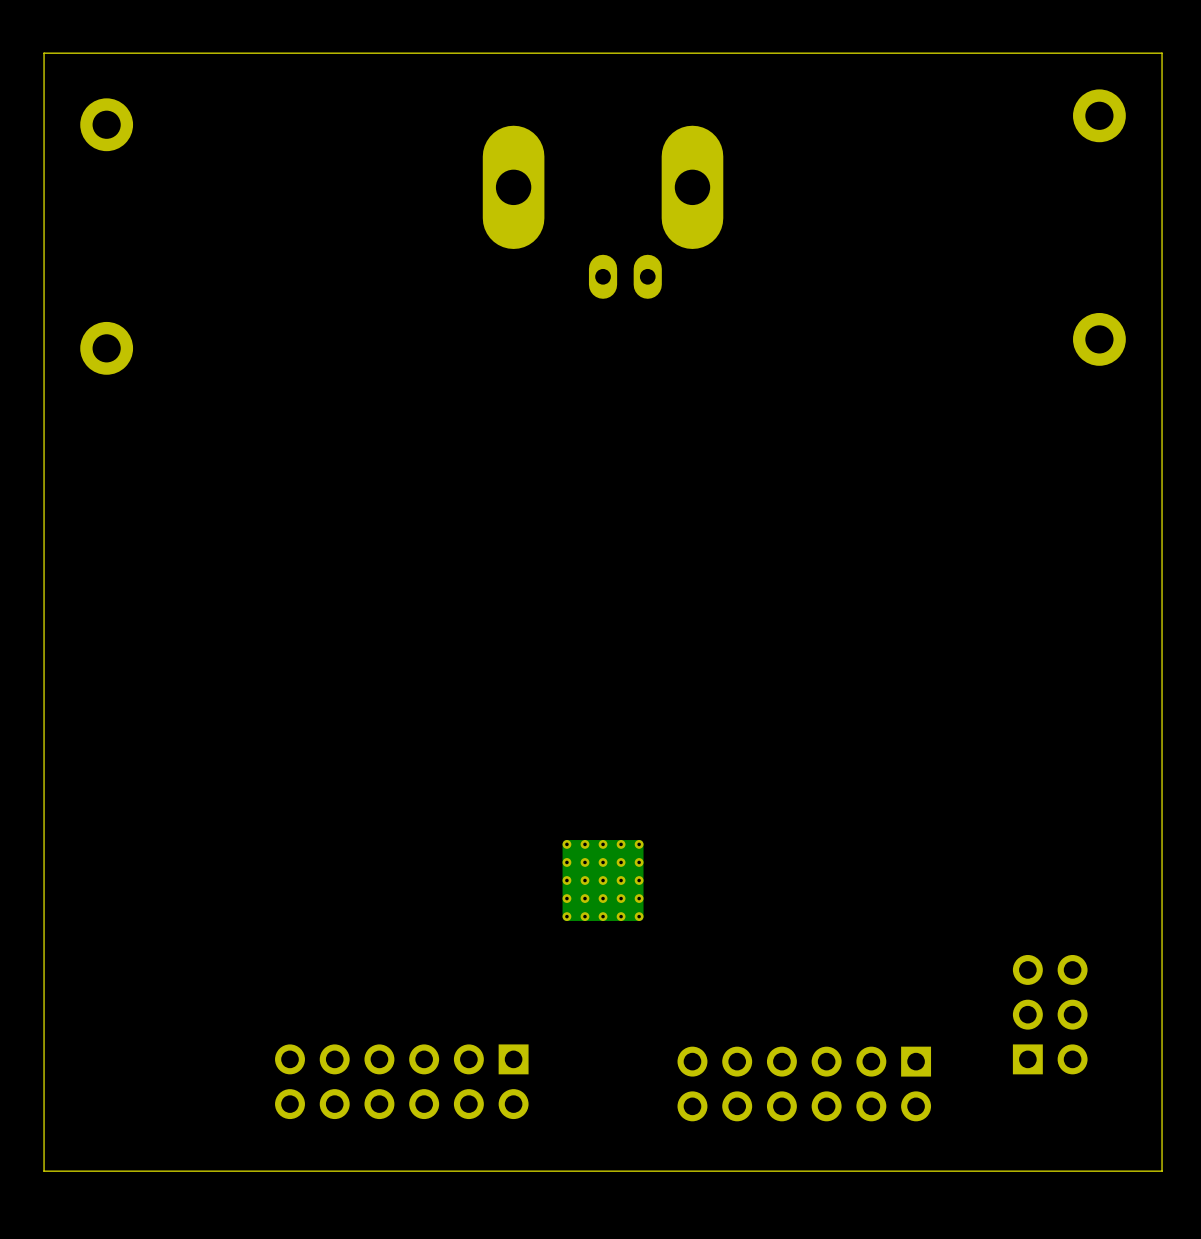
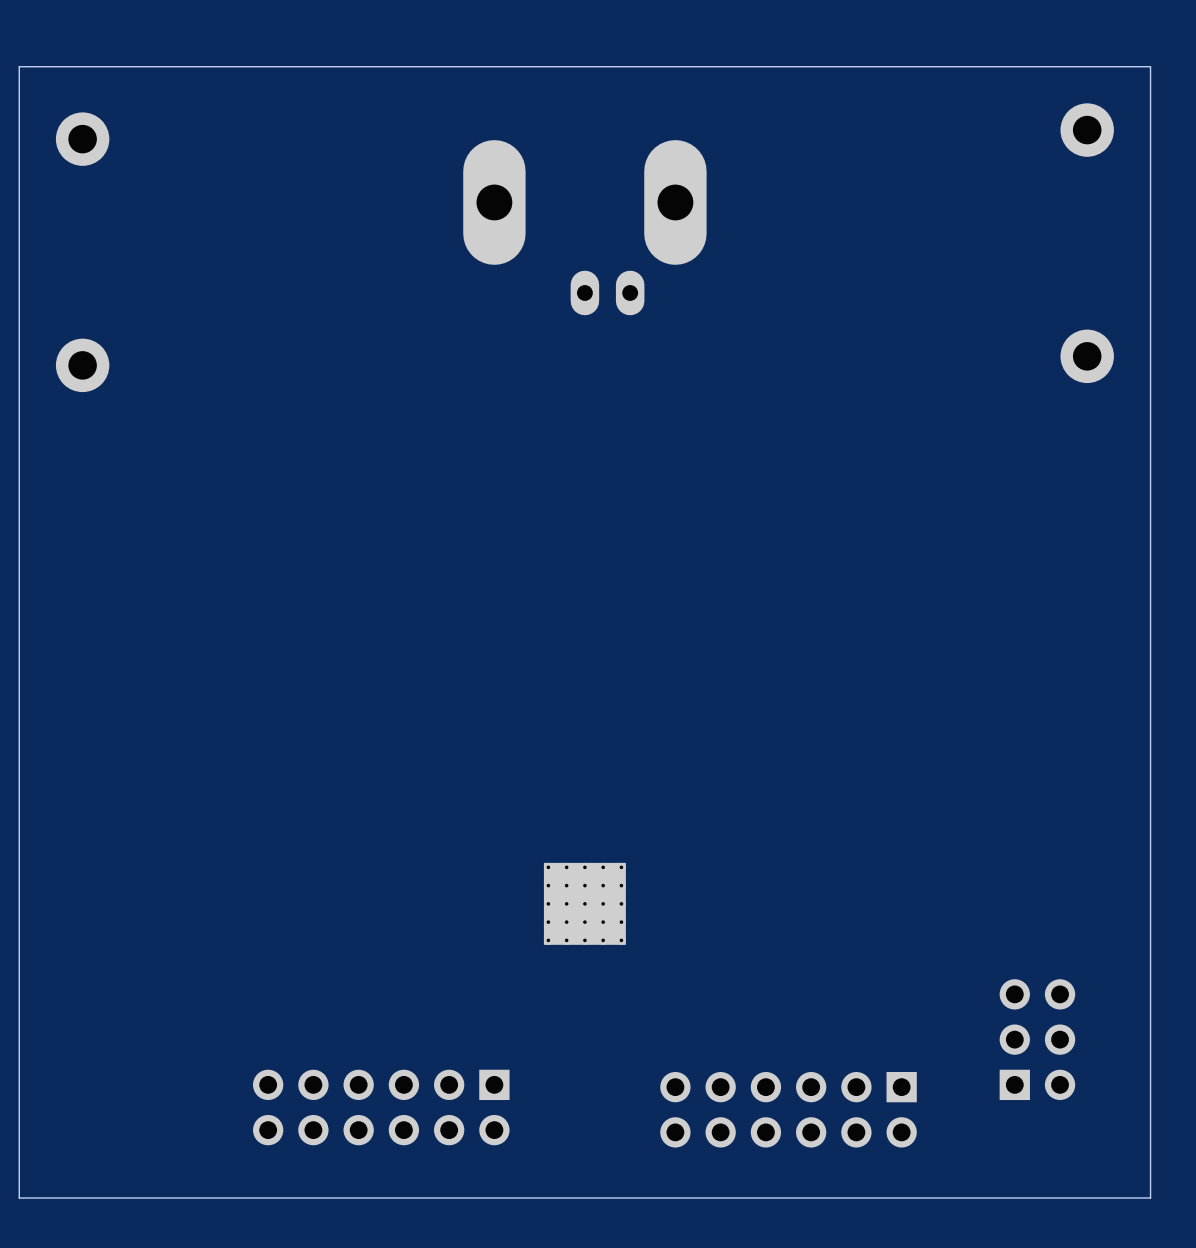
part footprint: [562, 840, 644, 922] -> [543, 862, 626, 945]

